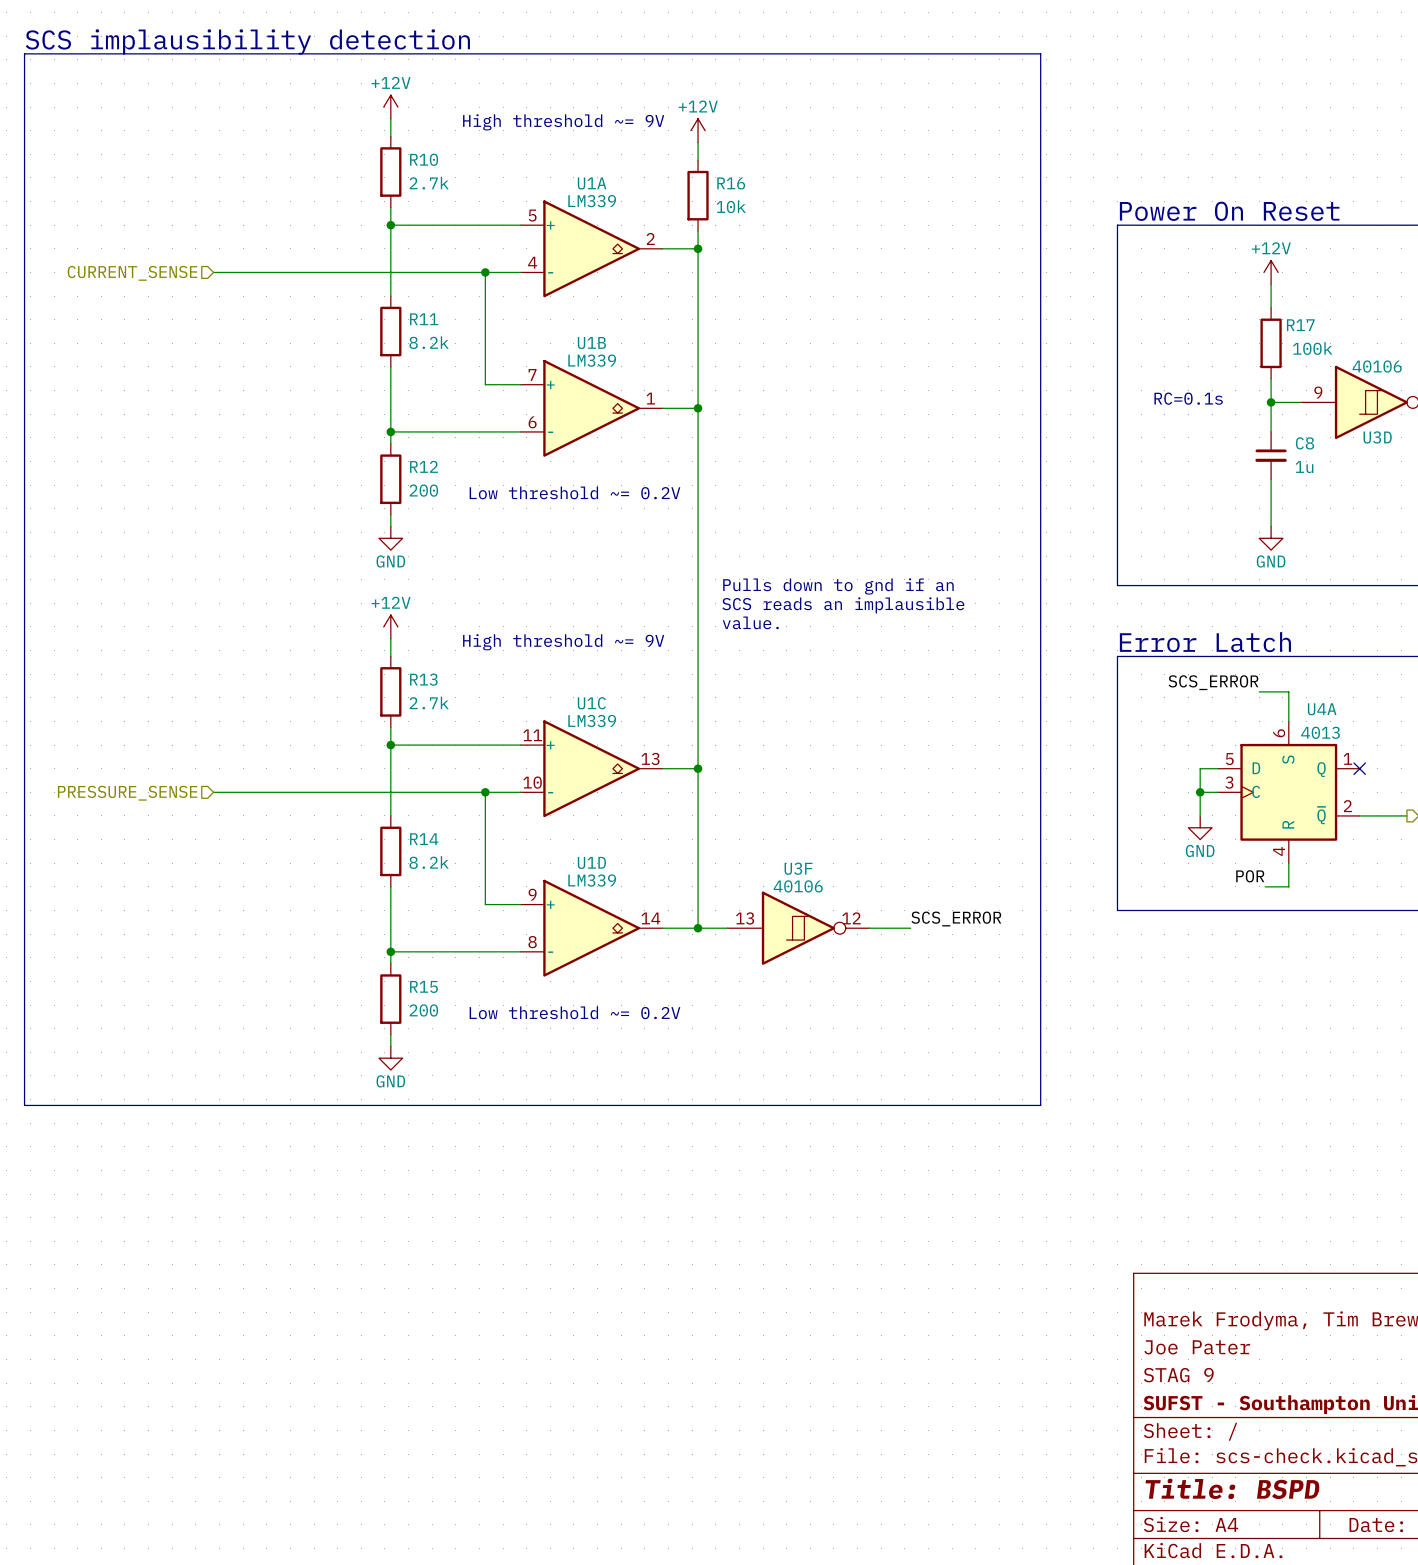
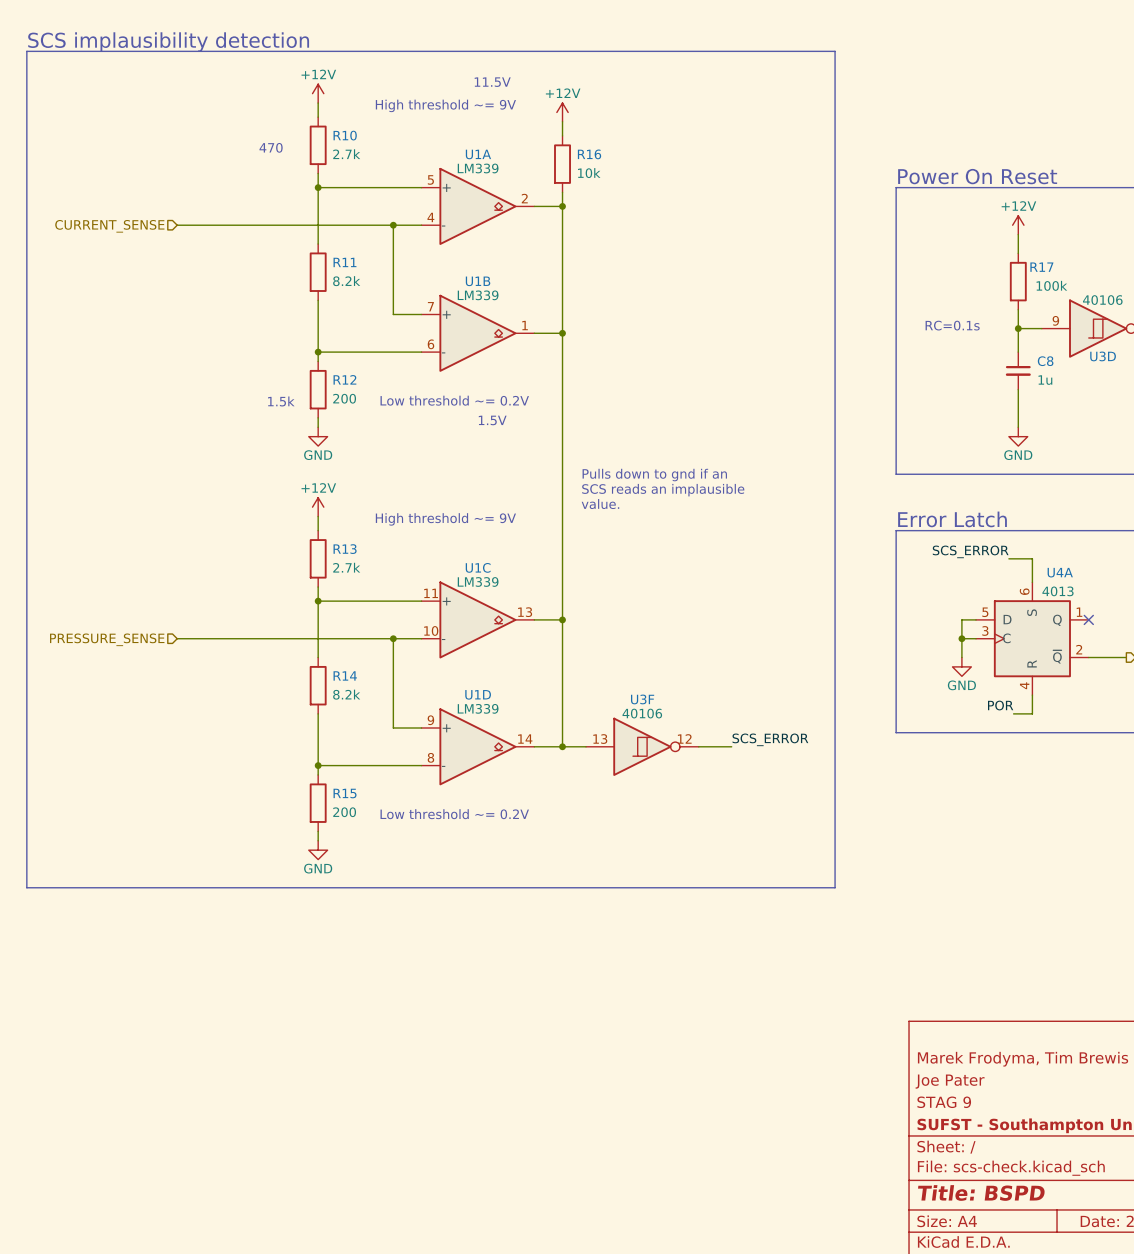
text: none -> 11.5V (492, 82)
text: none -> 470 (271, 147)
text: none -> 1.5k (281, 401)
text: none -> 1.5V (492, 420)

